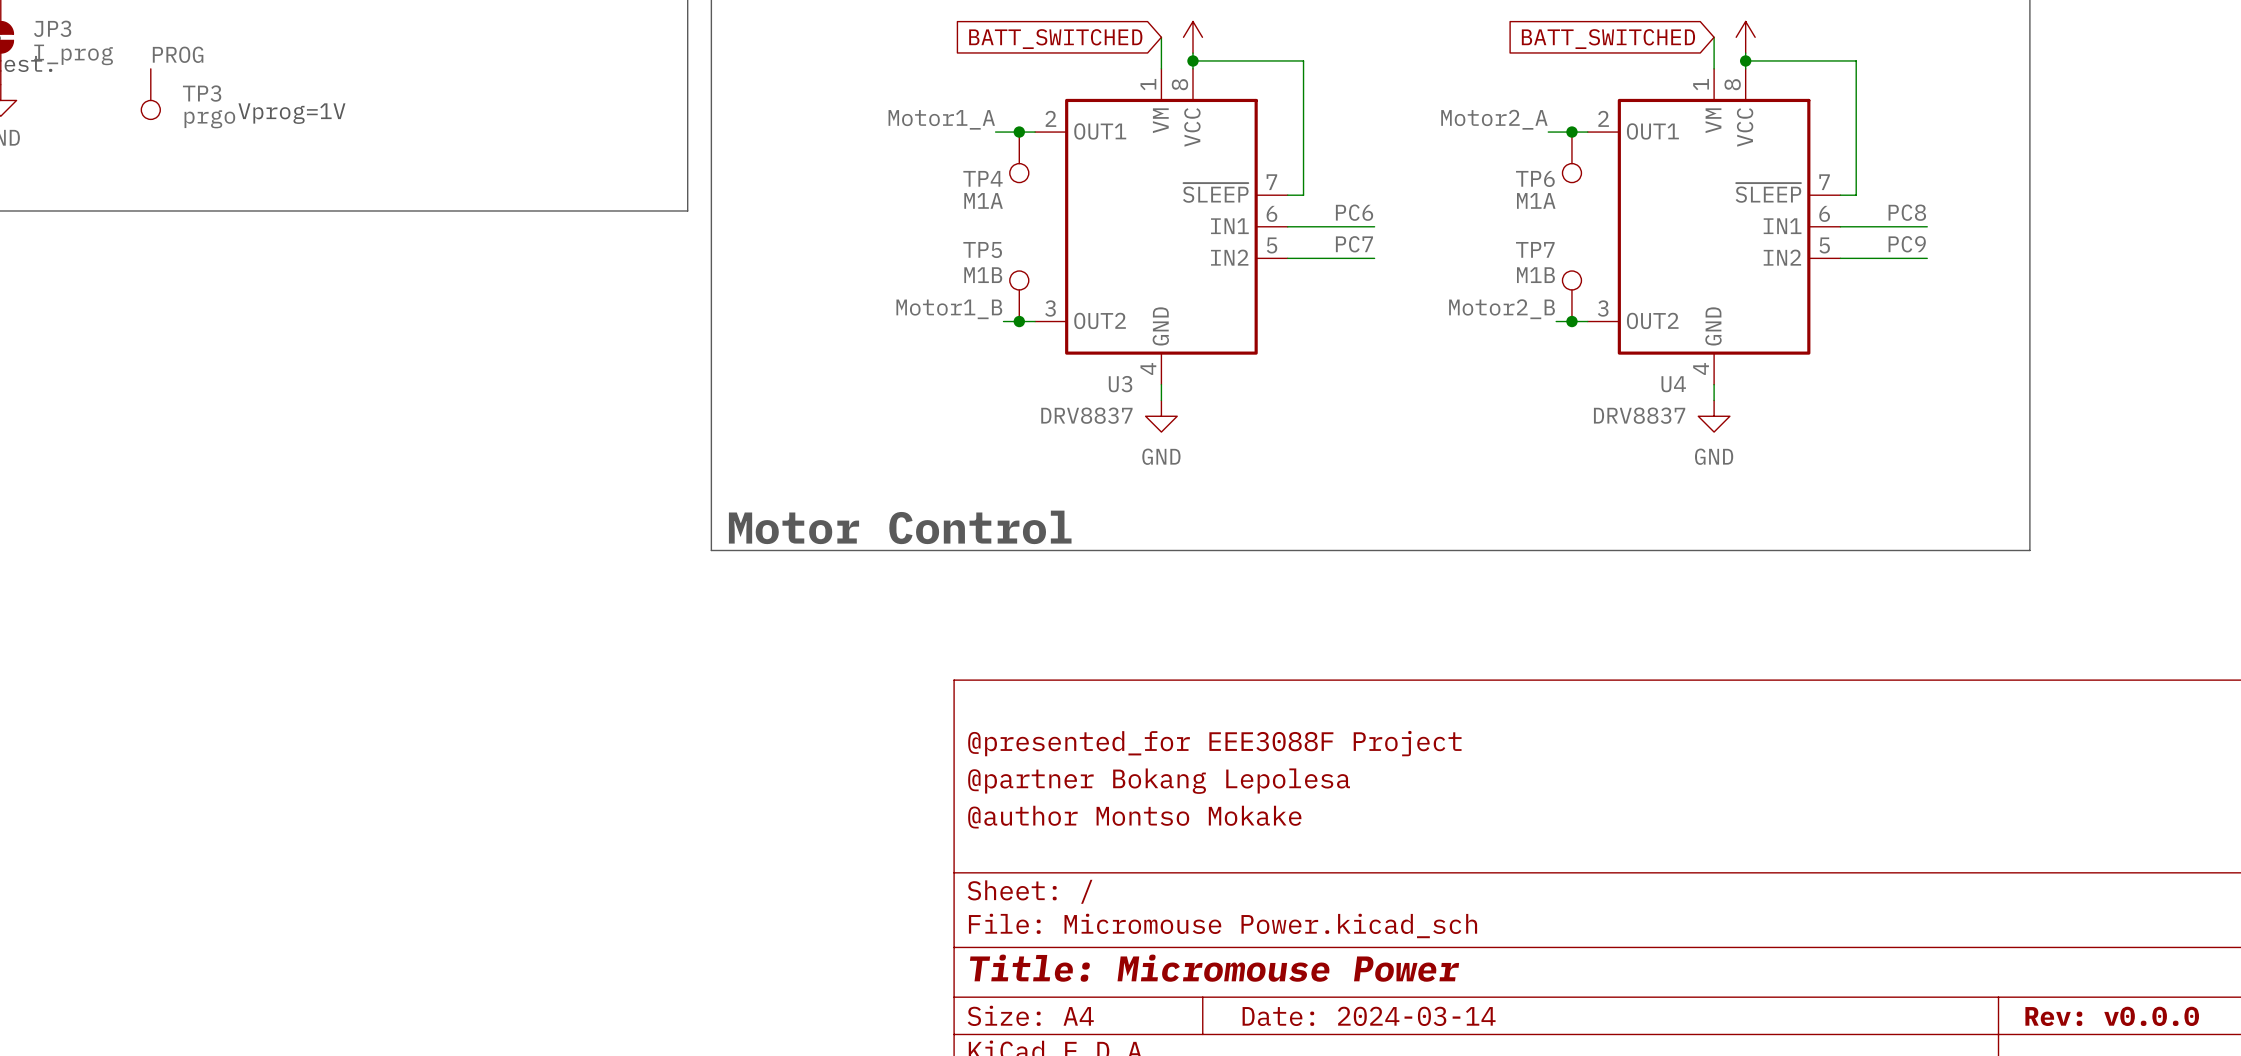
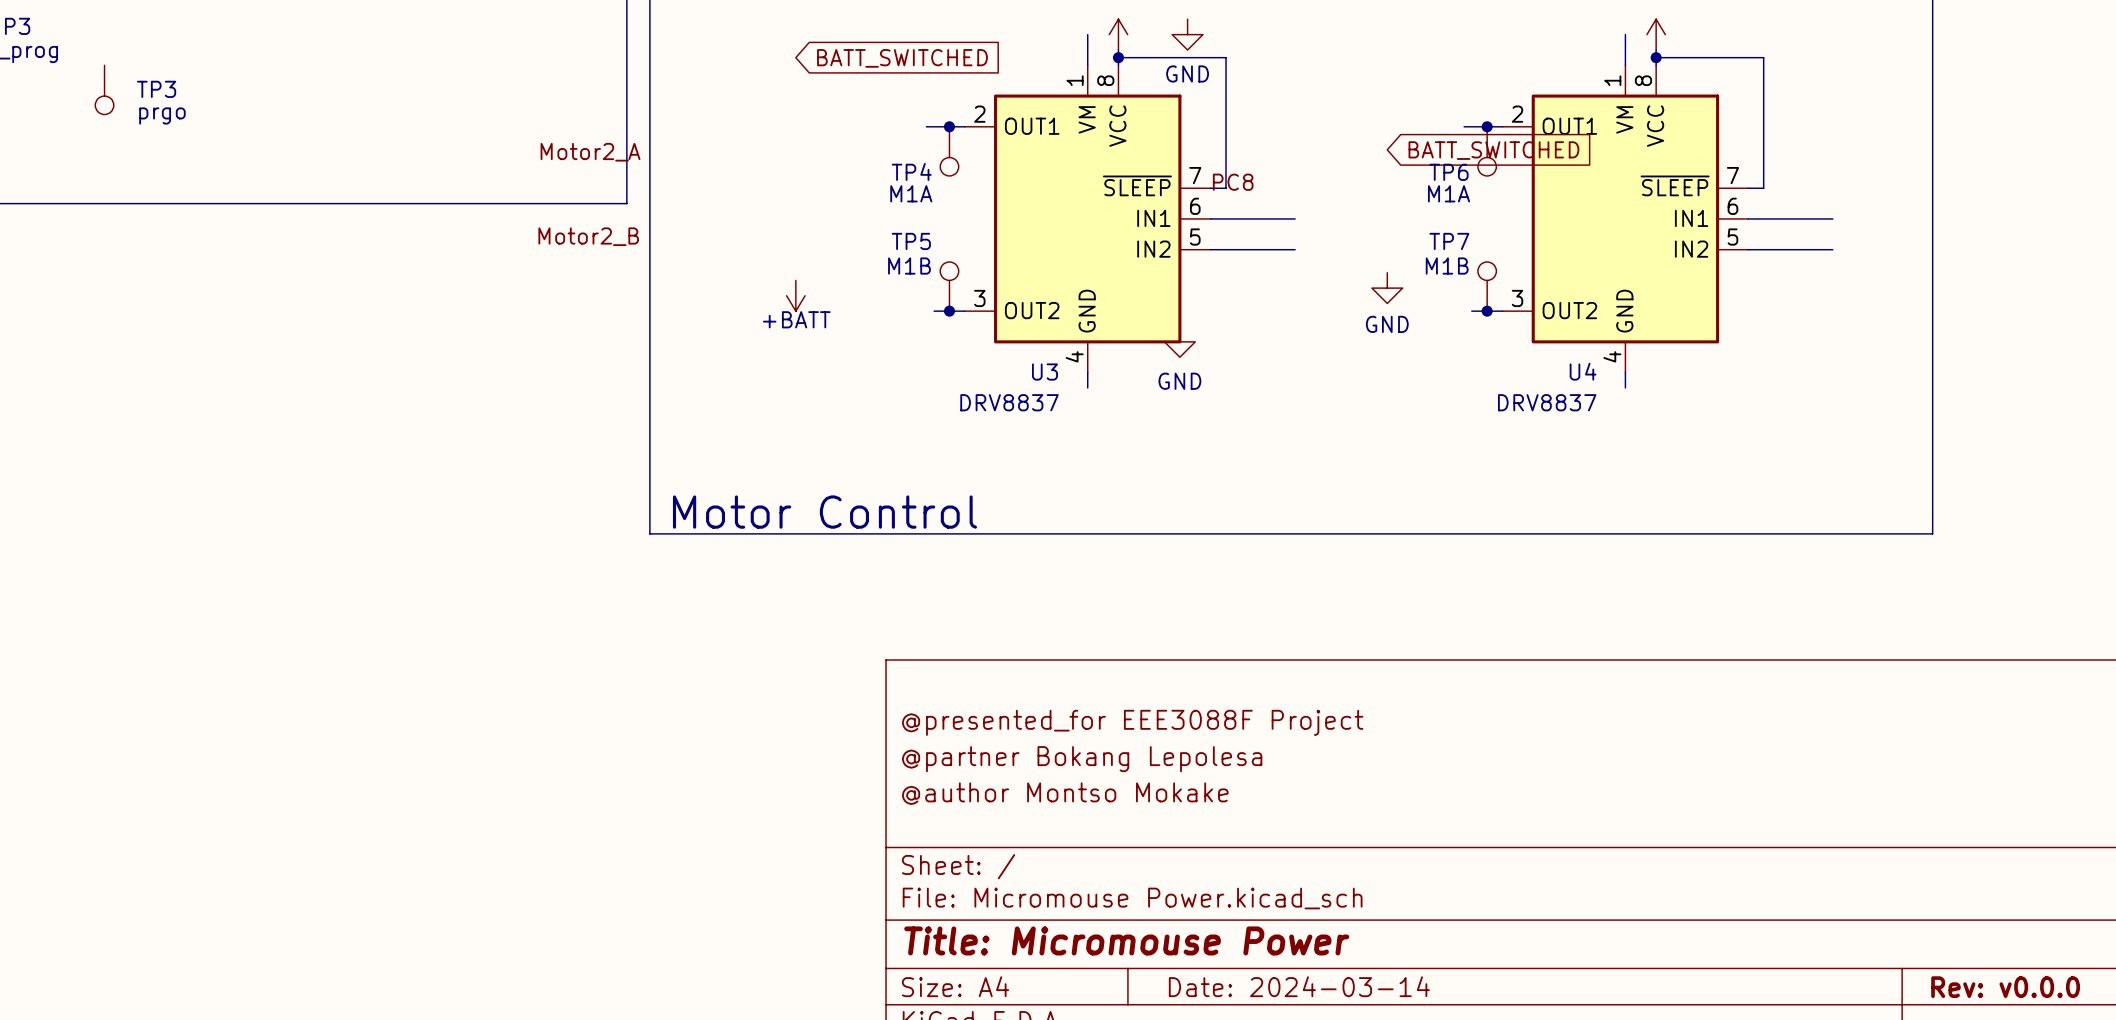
power symbol: none -> GND (1187, 34)
global label rotation: 0° (1055, 39) -> 180° (902, 58)
global label: BATT_SWITCHED (1608, 39) -> none
label: PROG (178, 54) -> none
text: Vprog=1V (291, 113) -> none
label: Motor1_A (941, 119) -> none
label: Motor2_A (1494, 119) -> none
global label: none -> BATT_SWITCHED (1493, 150)
label: none -> Motor2_A (590, 152)
label: PC6 (1354, 212) -> PC8 (1233, 182)
label: PC8 (1907, 212) -> none
label: PC7 (1354, 244) -> none
label: PC9 (1907, 244) -> none
label: none -> Motor2_B (588, 236)
power symbol: none -> GND (1387, 288)
power symbol: none -> +BATT (795, 295)
label: Motor1_B (949, 309) -> none
label: Motor2_B (1502, 309) -> none
power symbol position: GND (1161, 416) -> GND (1179, 341)
power symbol: GND (1714, 416) -> none

